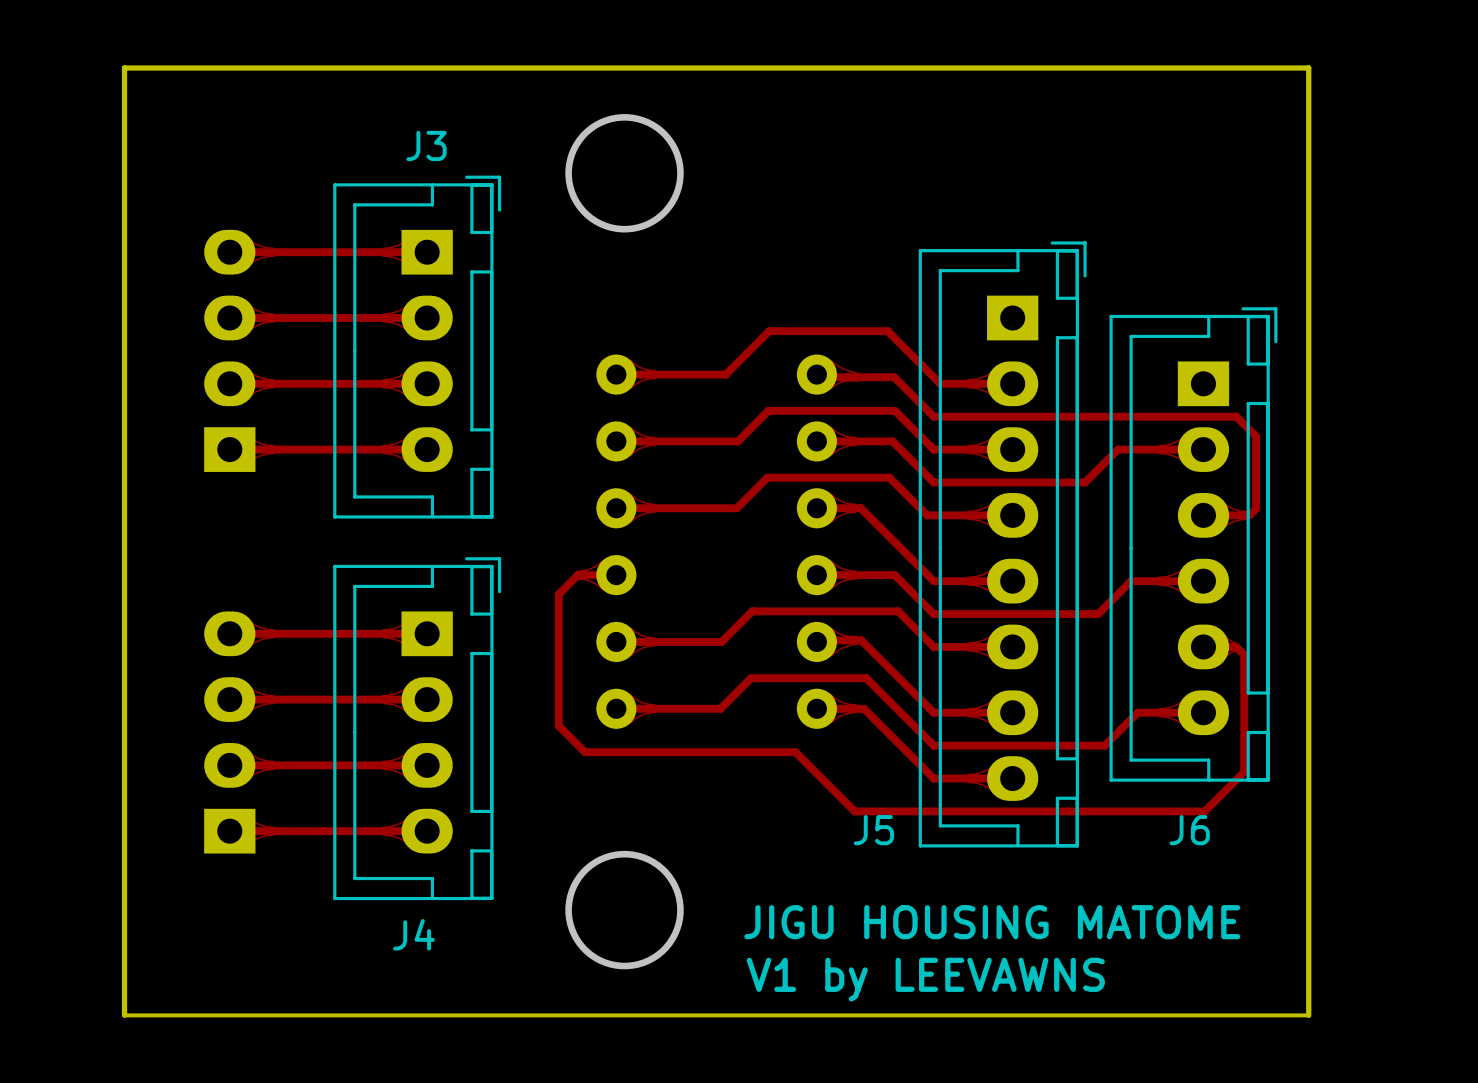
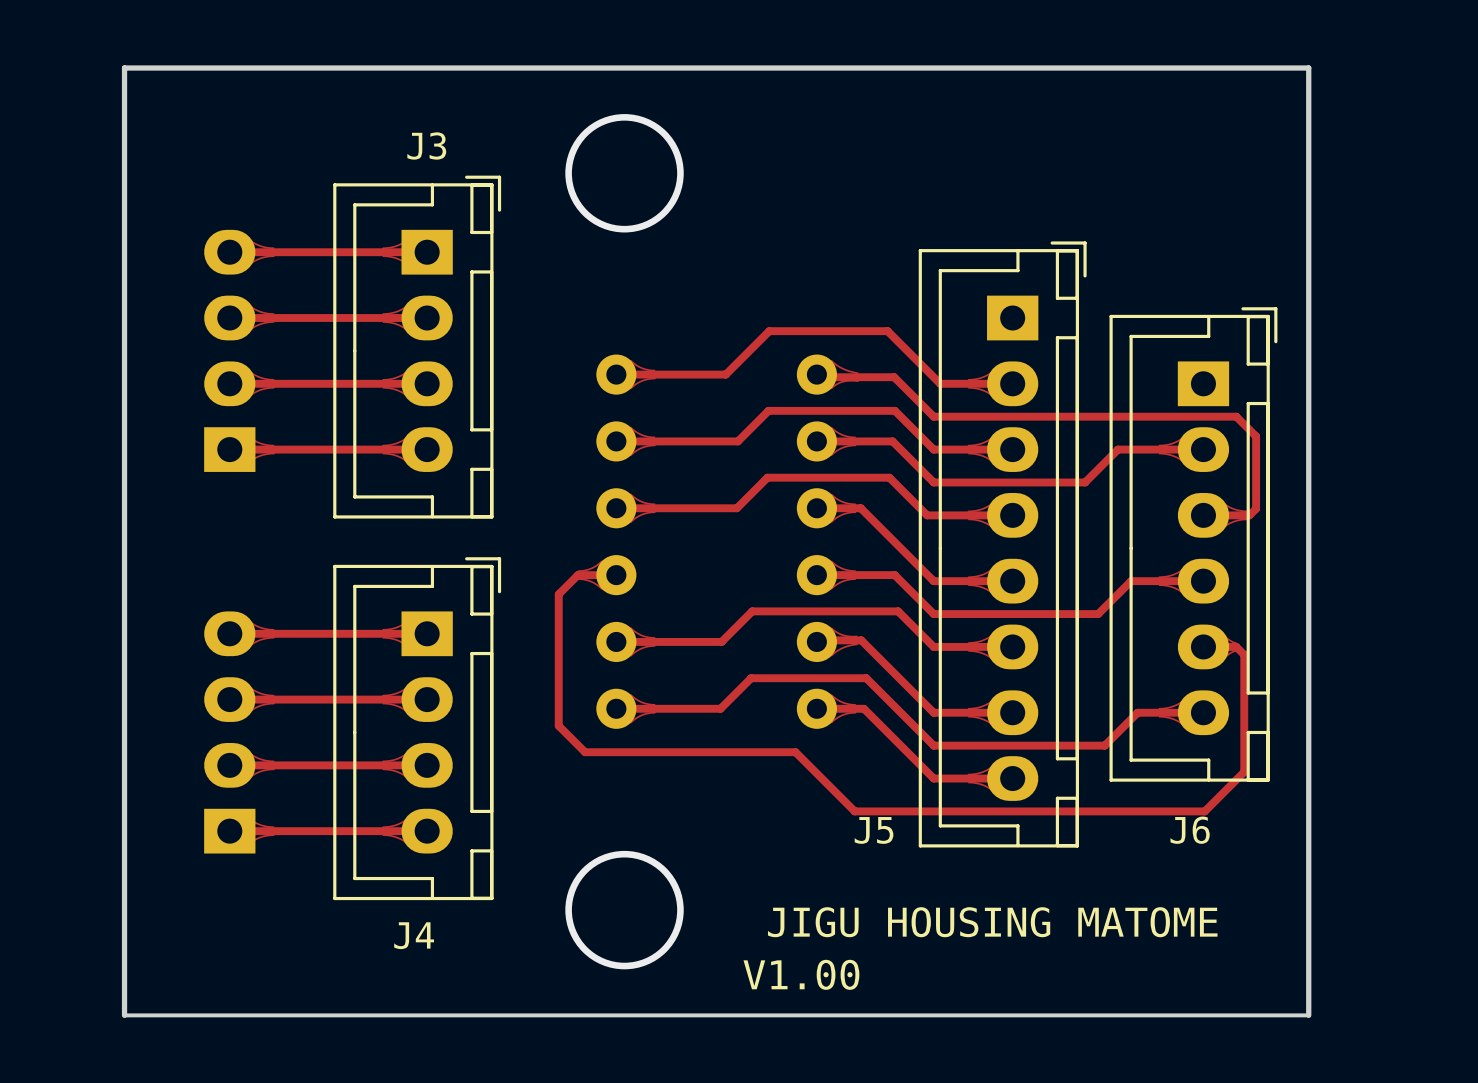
text: none -> V1.00 (801, 974)
text: V1 by LEEVAWNS (925, 979) -> none

